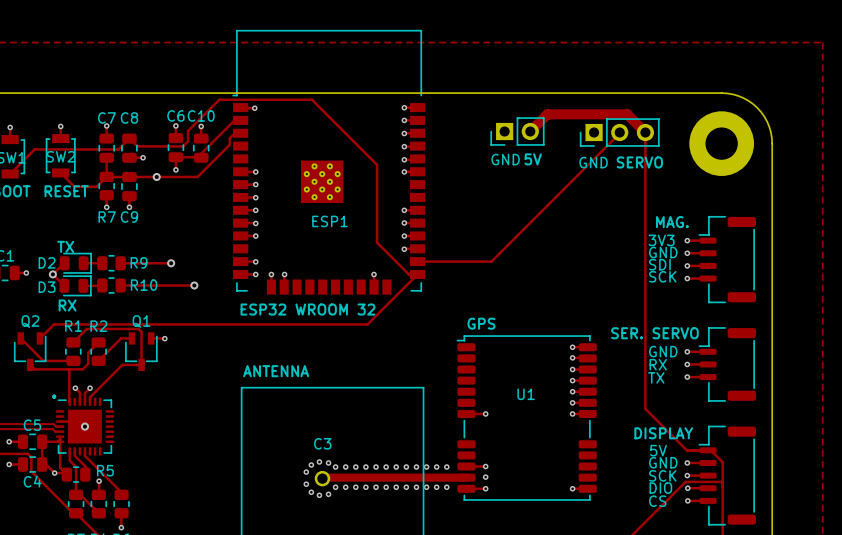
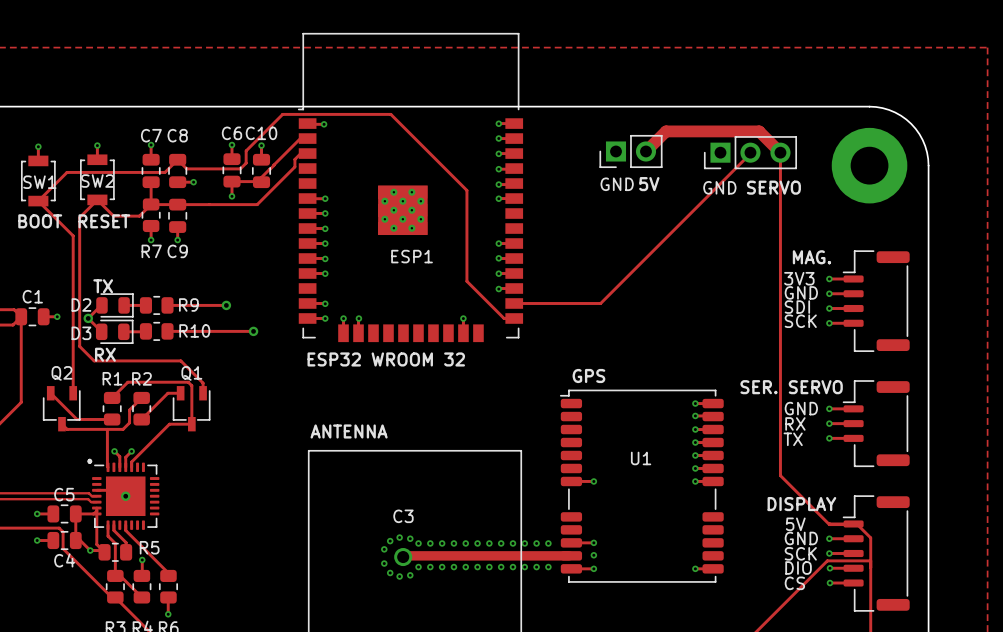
via: (156, 176) -> none
track: (417, 274) (367, 324) (54, 324) (40, 338) -> (38, 201) (73, 235) (73, 393)
track: (151, 338) (164, 338) -> (203, 393) (203, 383) (180, 360) (94, 360) (79, 346) (79, 217) (97, 199)
via: (164, 338) -> none

